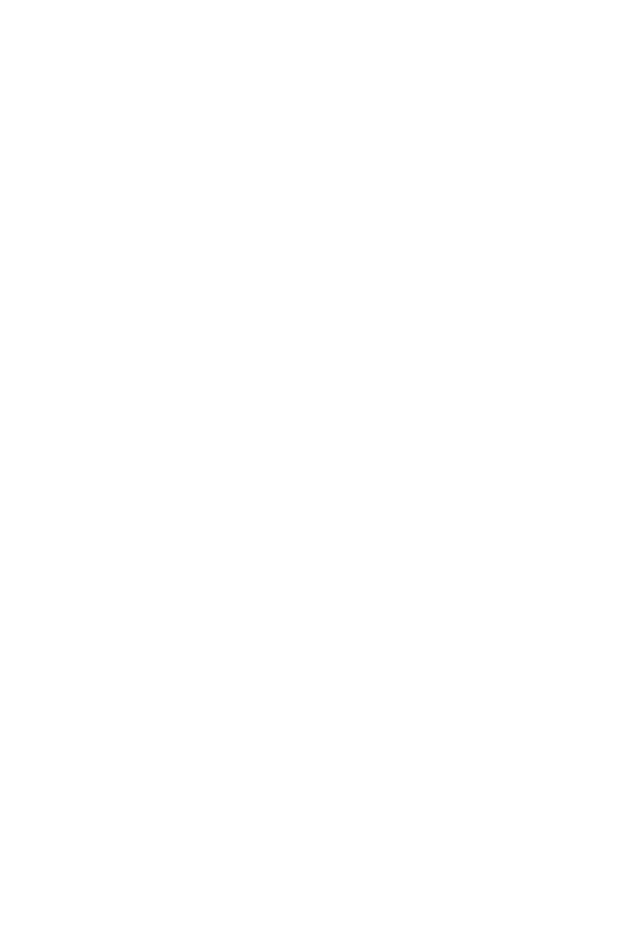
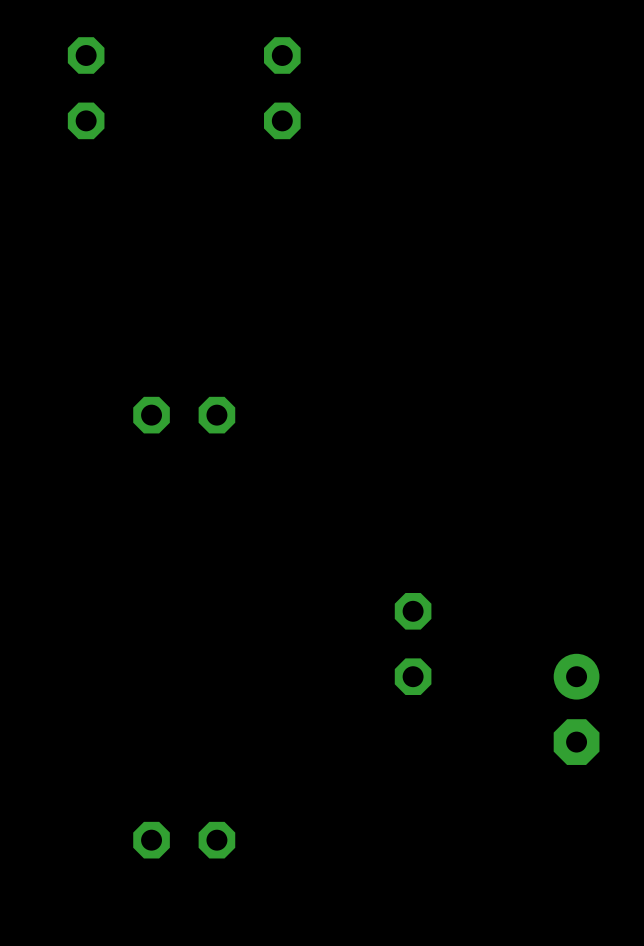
part: none -> (86, 88)
part: none -> (282, 88)
part: none -> (184, 415)
part: none -> (413, 644)
part: none -> (576, 709)
part: none -> (184, 840)

